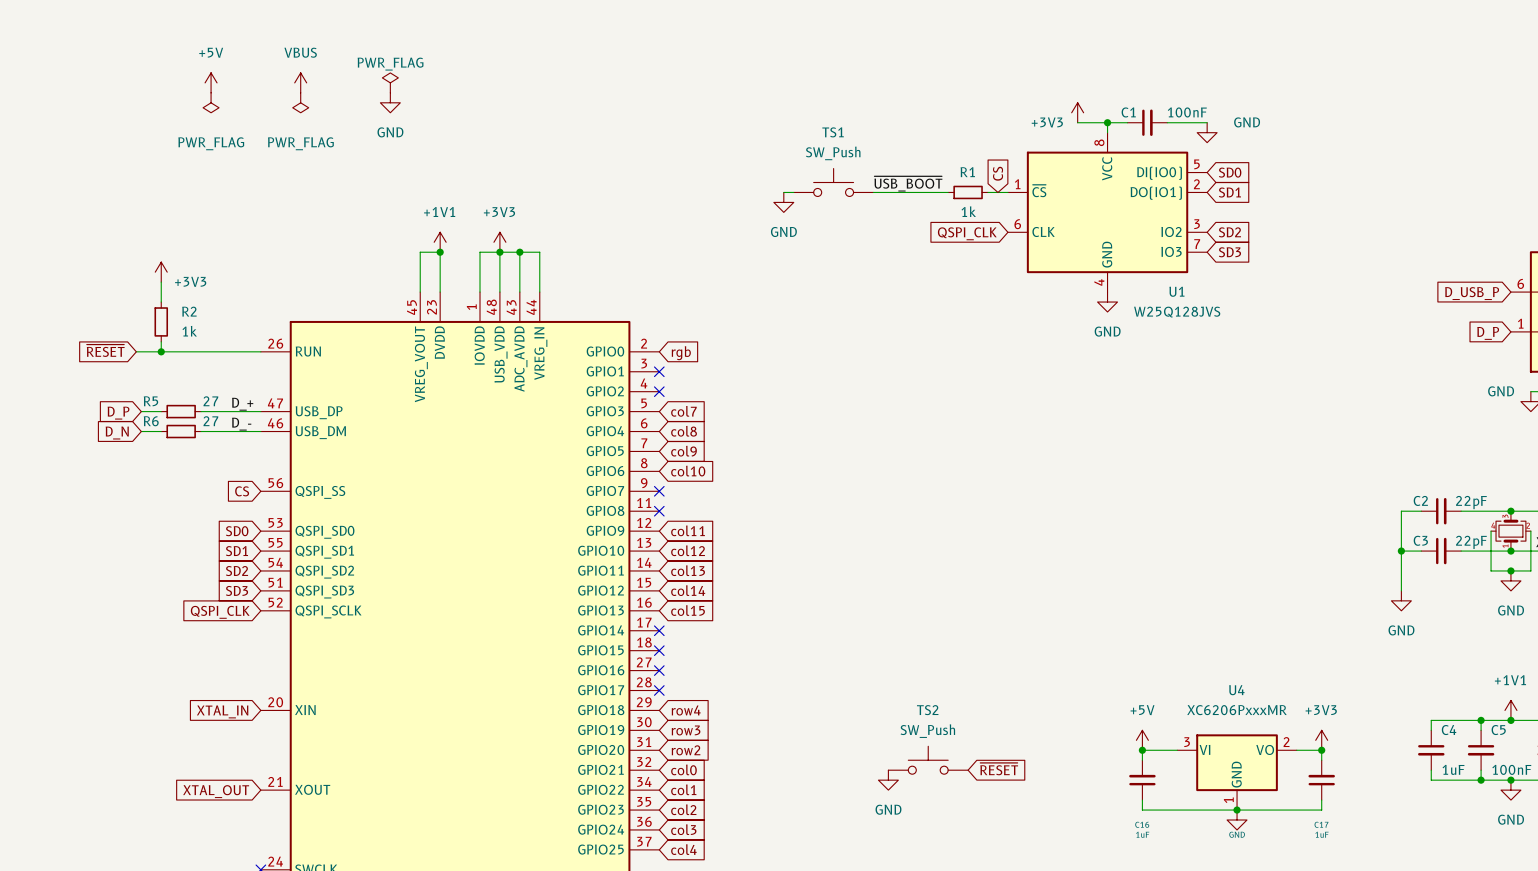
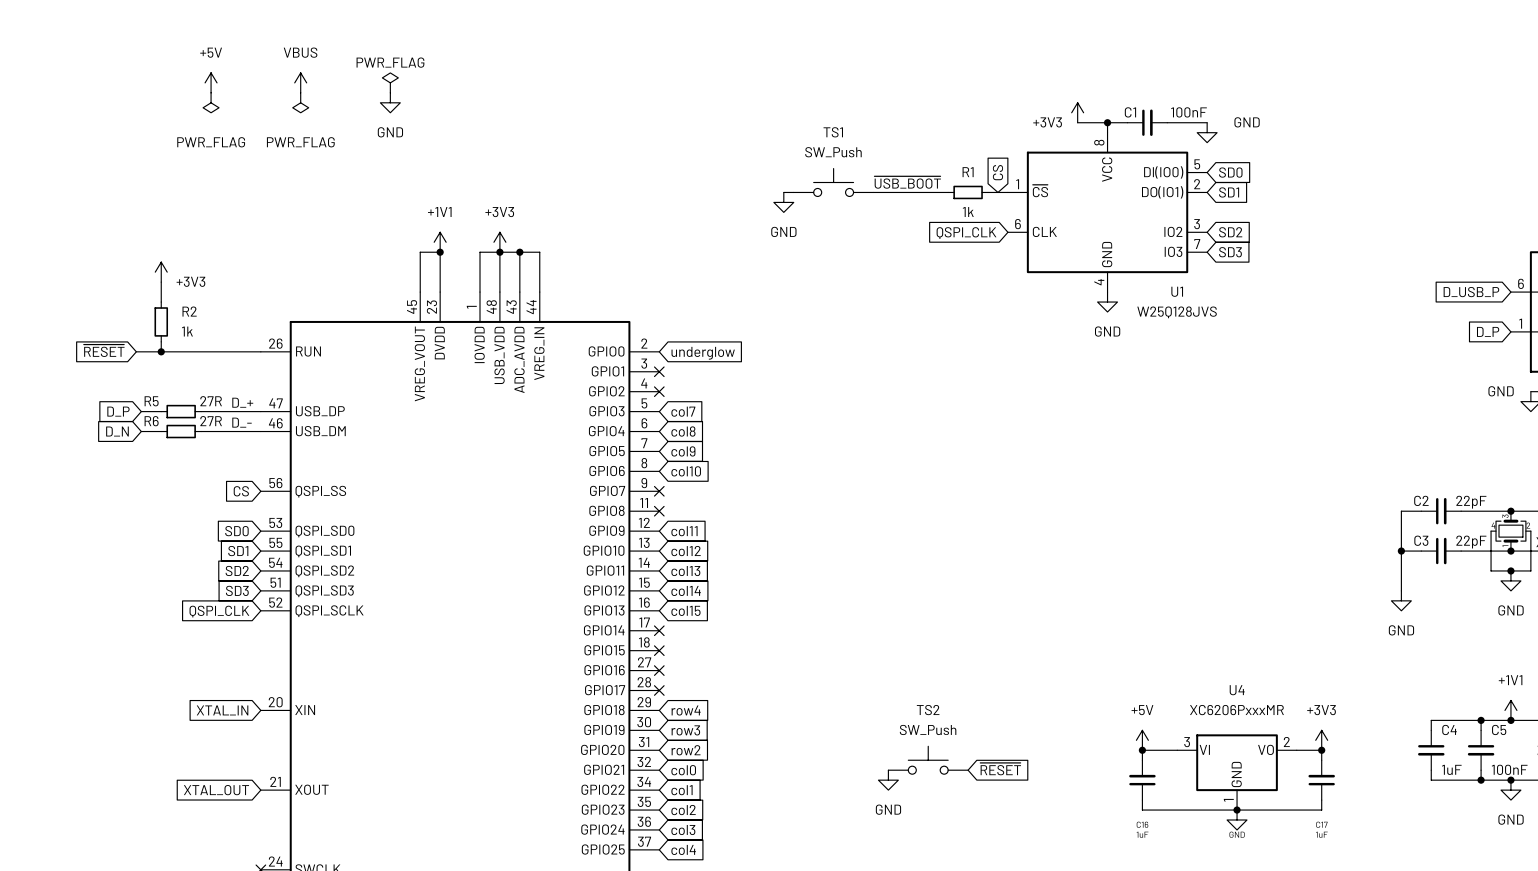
global label: rgb (681, 353) -> underglow (703, 353)
R5 value: 27 (210, 401) -> 27R (211, 401)
R6 value: 27 (210, 421) -> 27R (211, 421)

